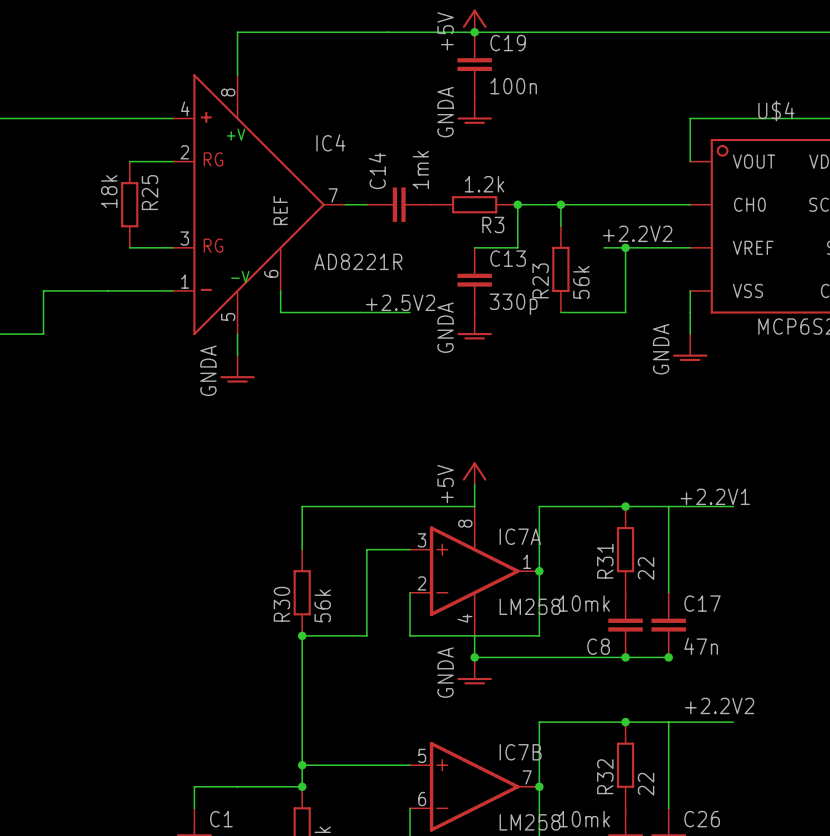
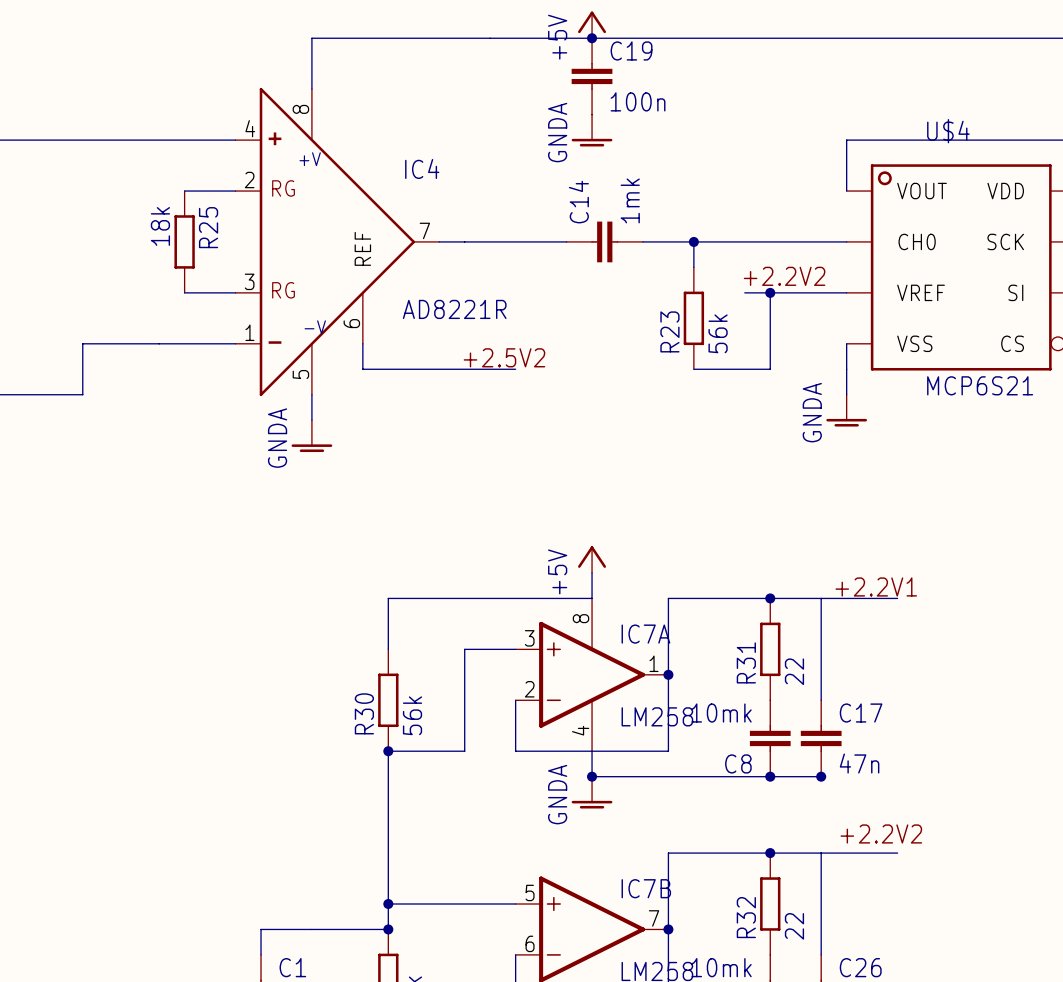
C14 position: (399, 204) -> (604, 241)
R3: 1.2k (474, 204) -> none
wire: (517, 204) (517, 247) (474, 247) -> none
junction: (517, 204) -> none
C13: 330p (474, 280) -> none
power symbol: GNDA (474, 325) -> none

